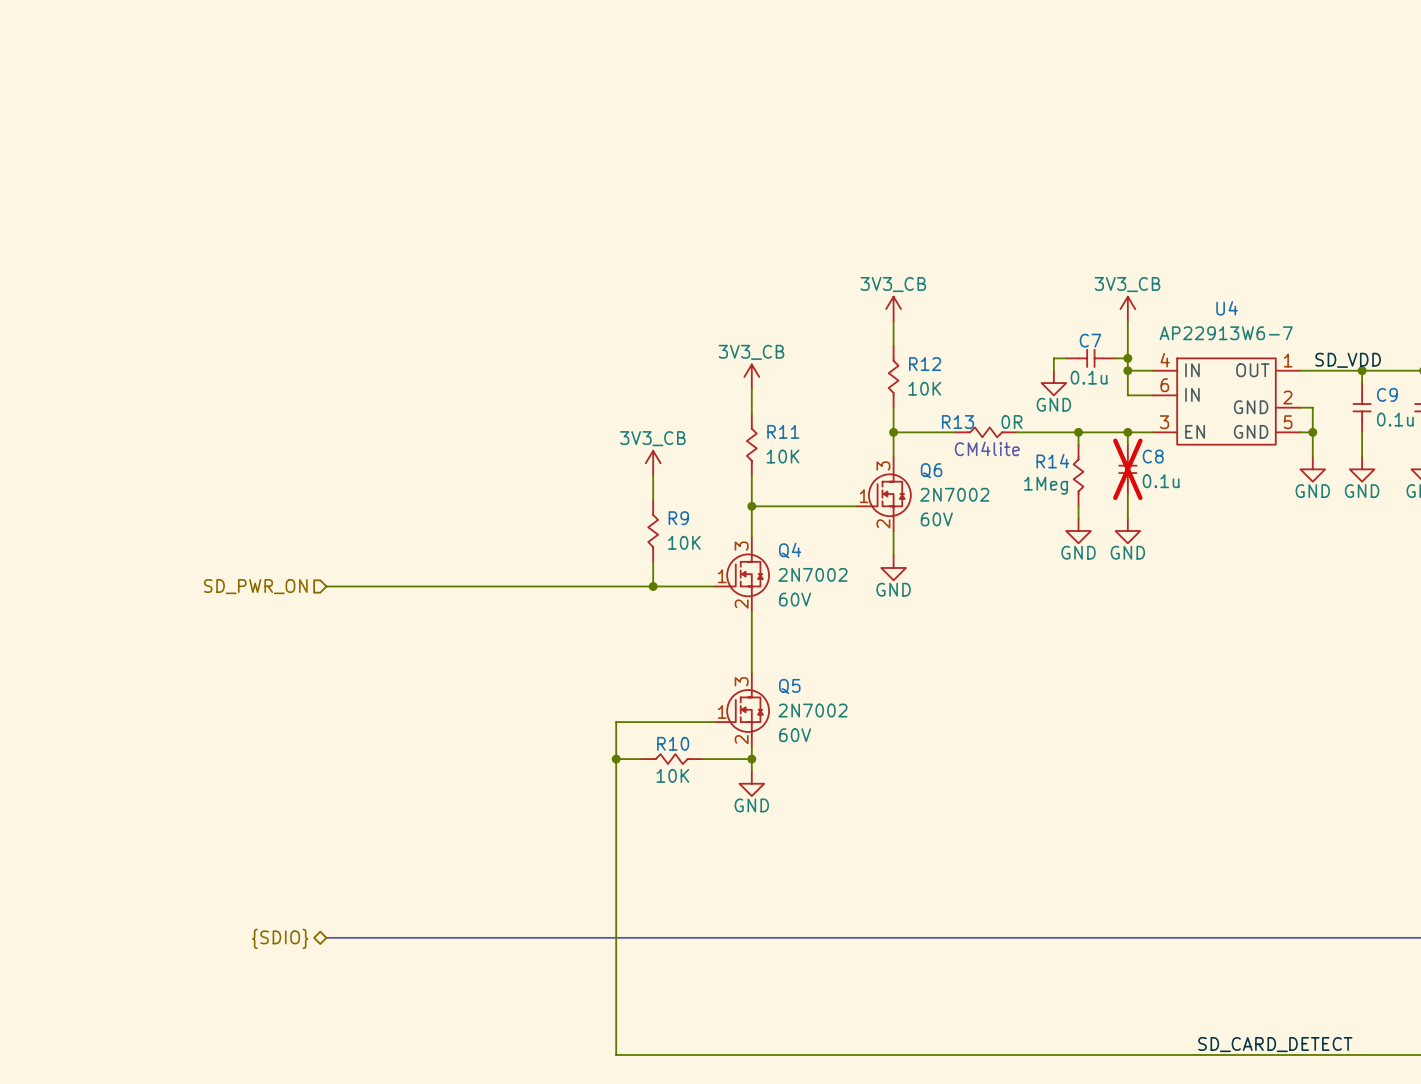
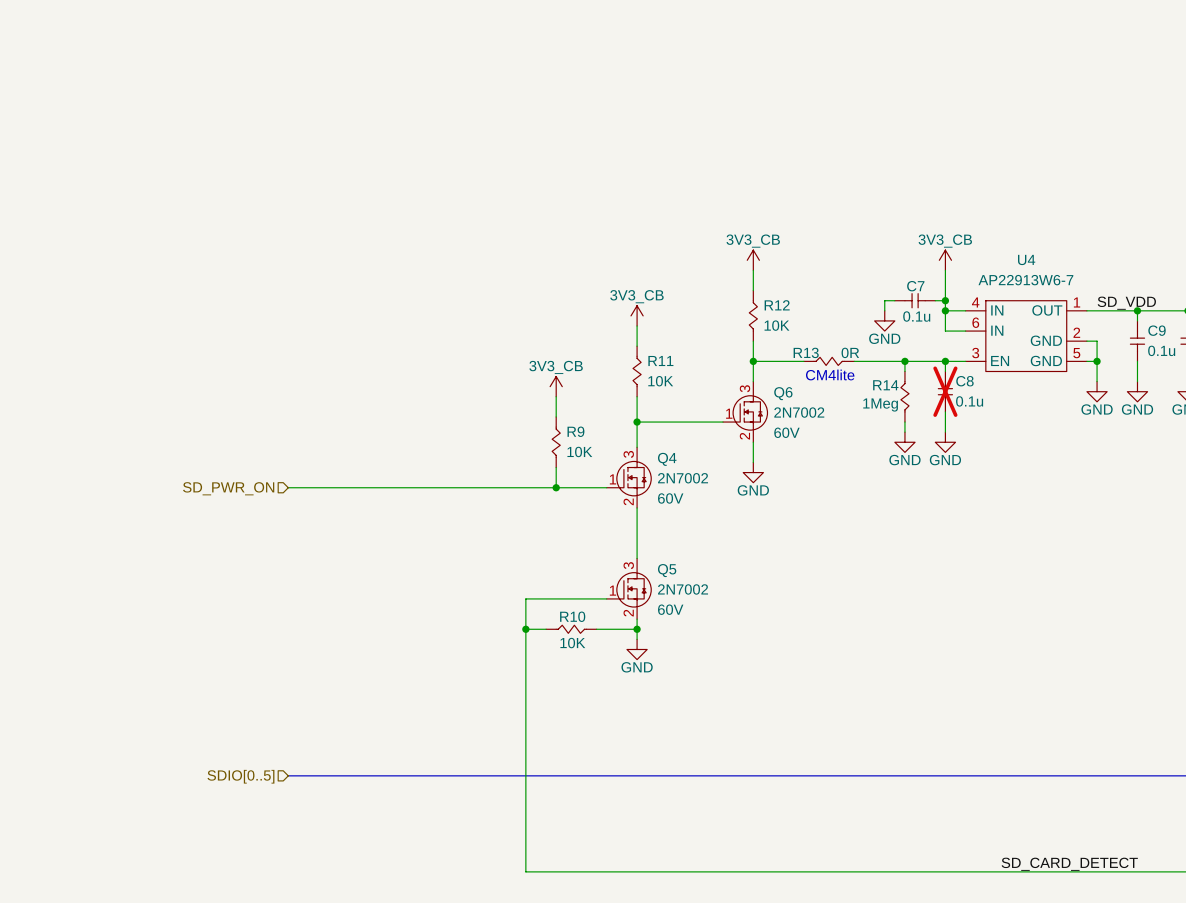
hierarchical label shape: bidirectional (280, 938) -> input (240, 776)
hierarchical label: {SDIO} (280, 938) -> SDIO[0..5] (240, 776)

